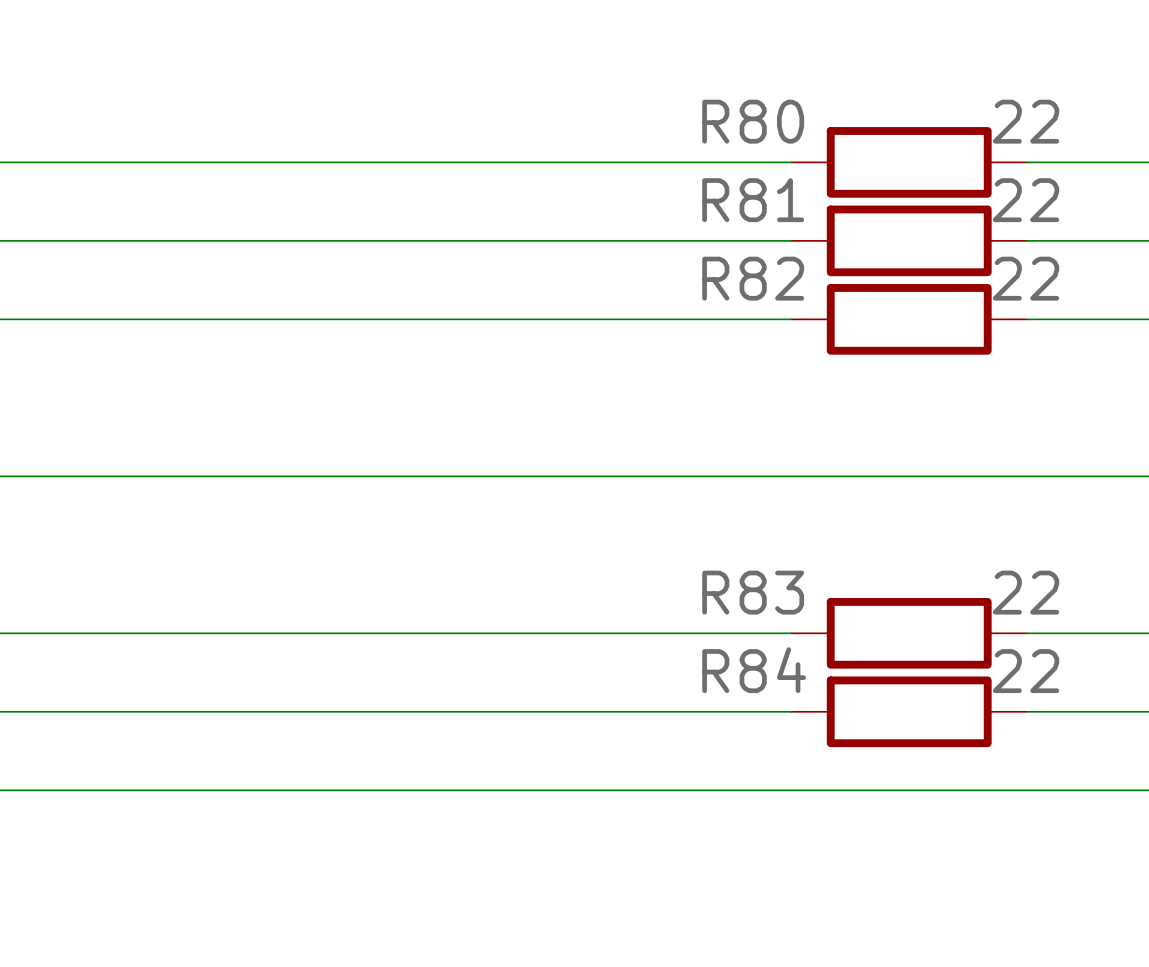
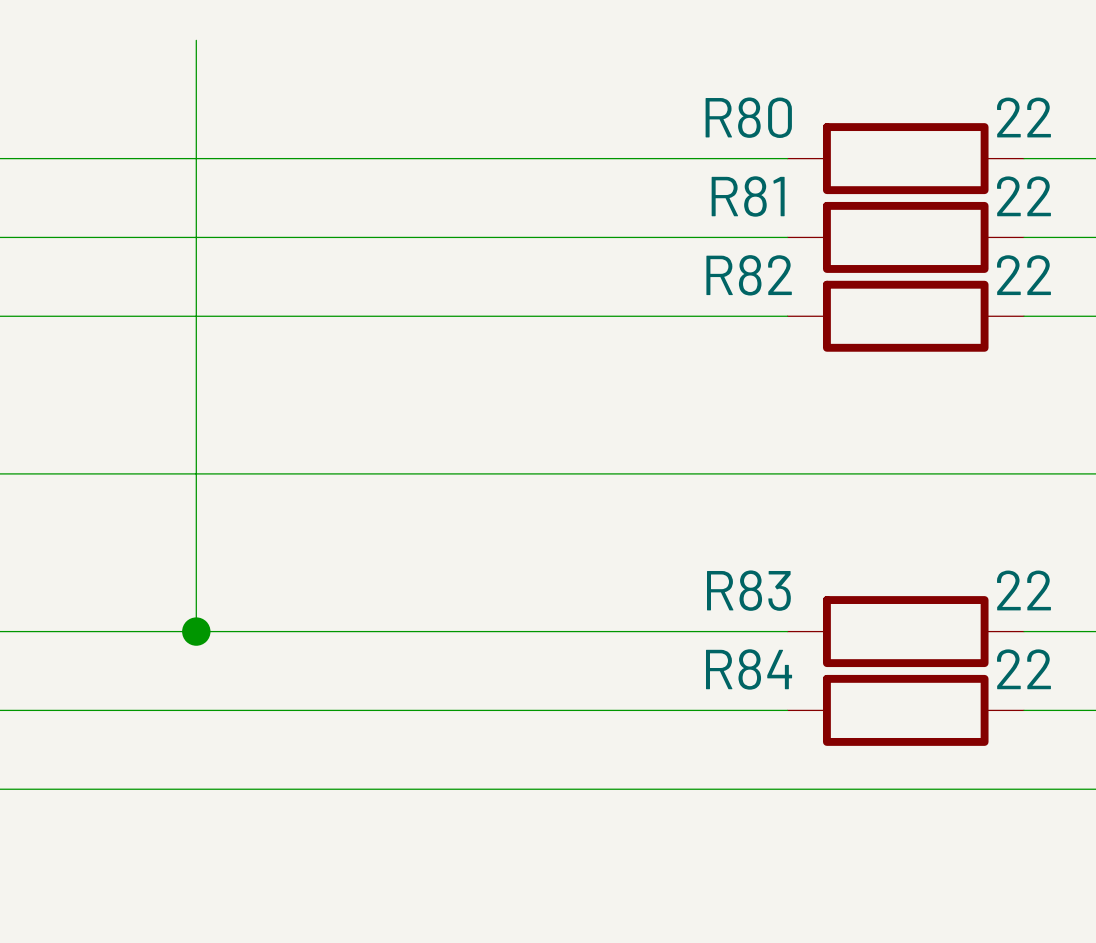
wire: none -> (196, 40) (196, 631)
junction: none -> (196, 631)

